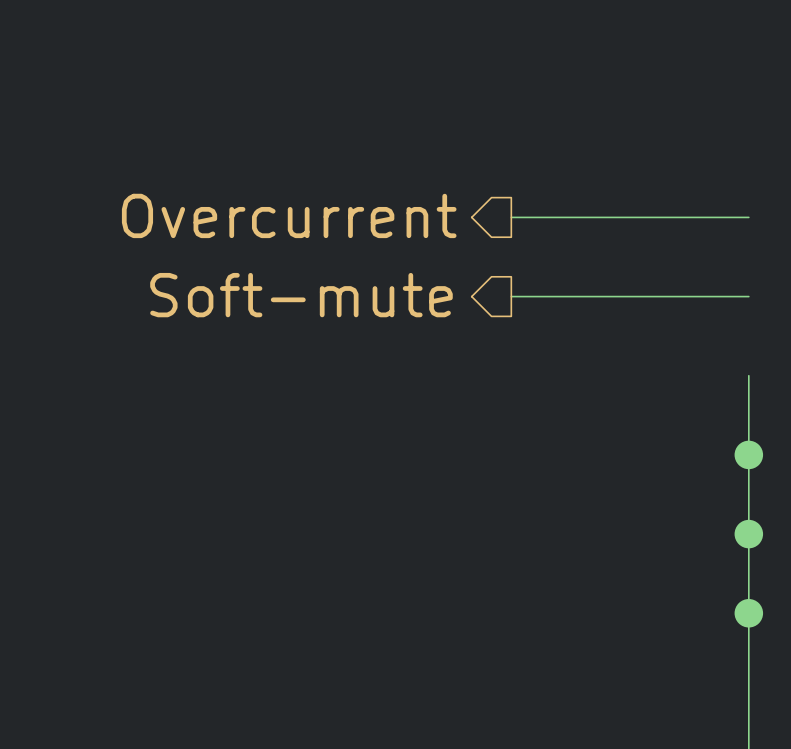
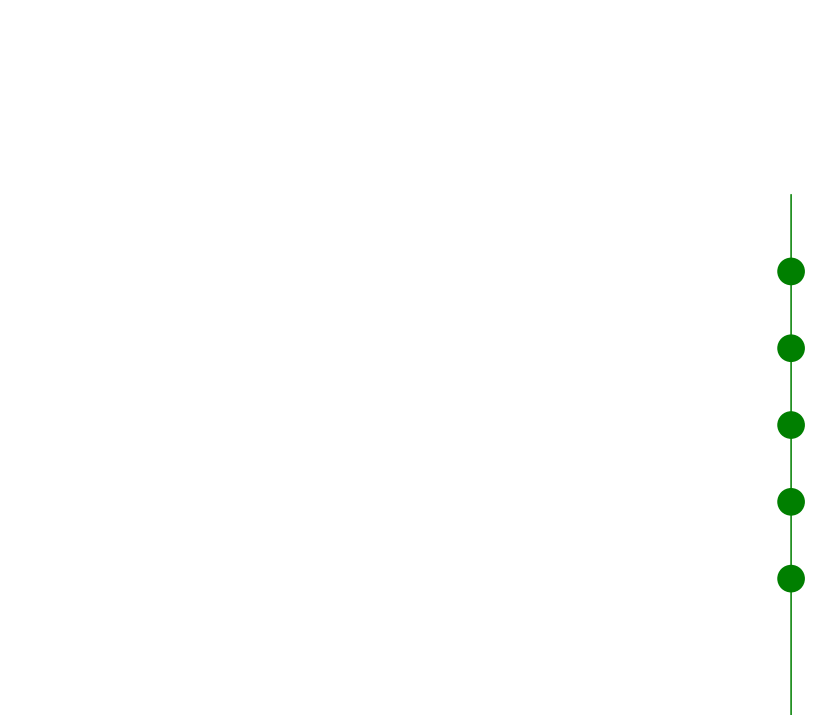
hierarchical label: Overcurrent (289, 215) -> none
wire: (511, 217) (748, 217) -> (791, 348) (791, 194)
hierarchical label: Soft-mute (301, 295) -> none
wire: (511, 296) (748, 296) -> none
junction: none -> (791, 271)
junction: none -> (791, 348)

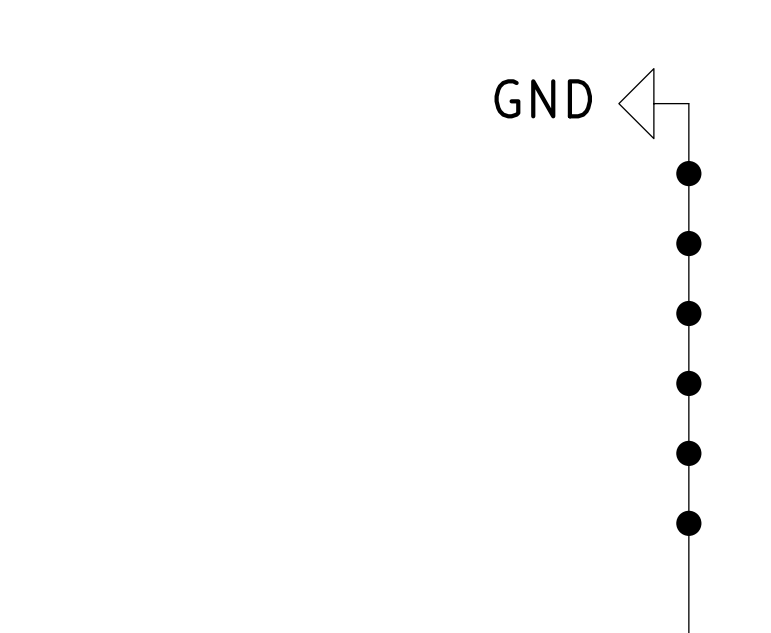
power symbol: none -> GND (653, 103)
wire: none -> (688, 103) (688, 173)
junction: none -> (688, 173)

